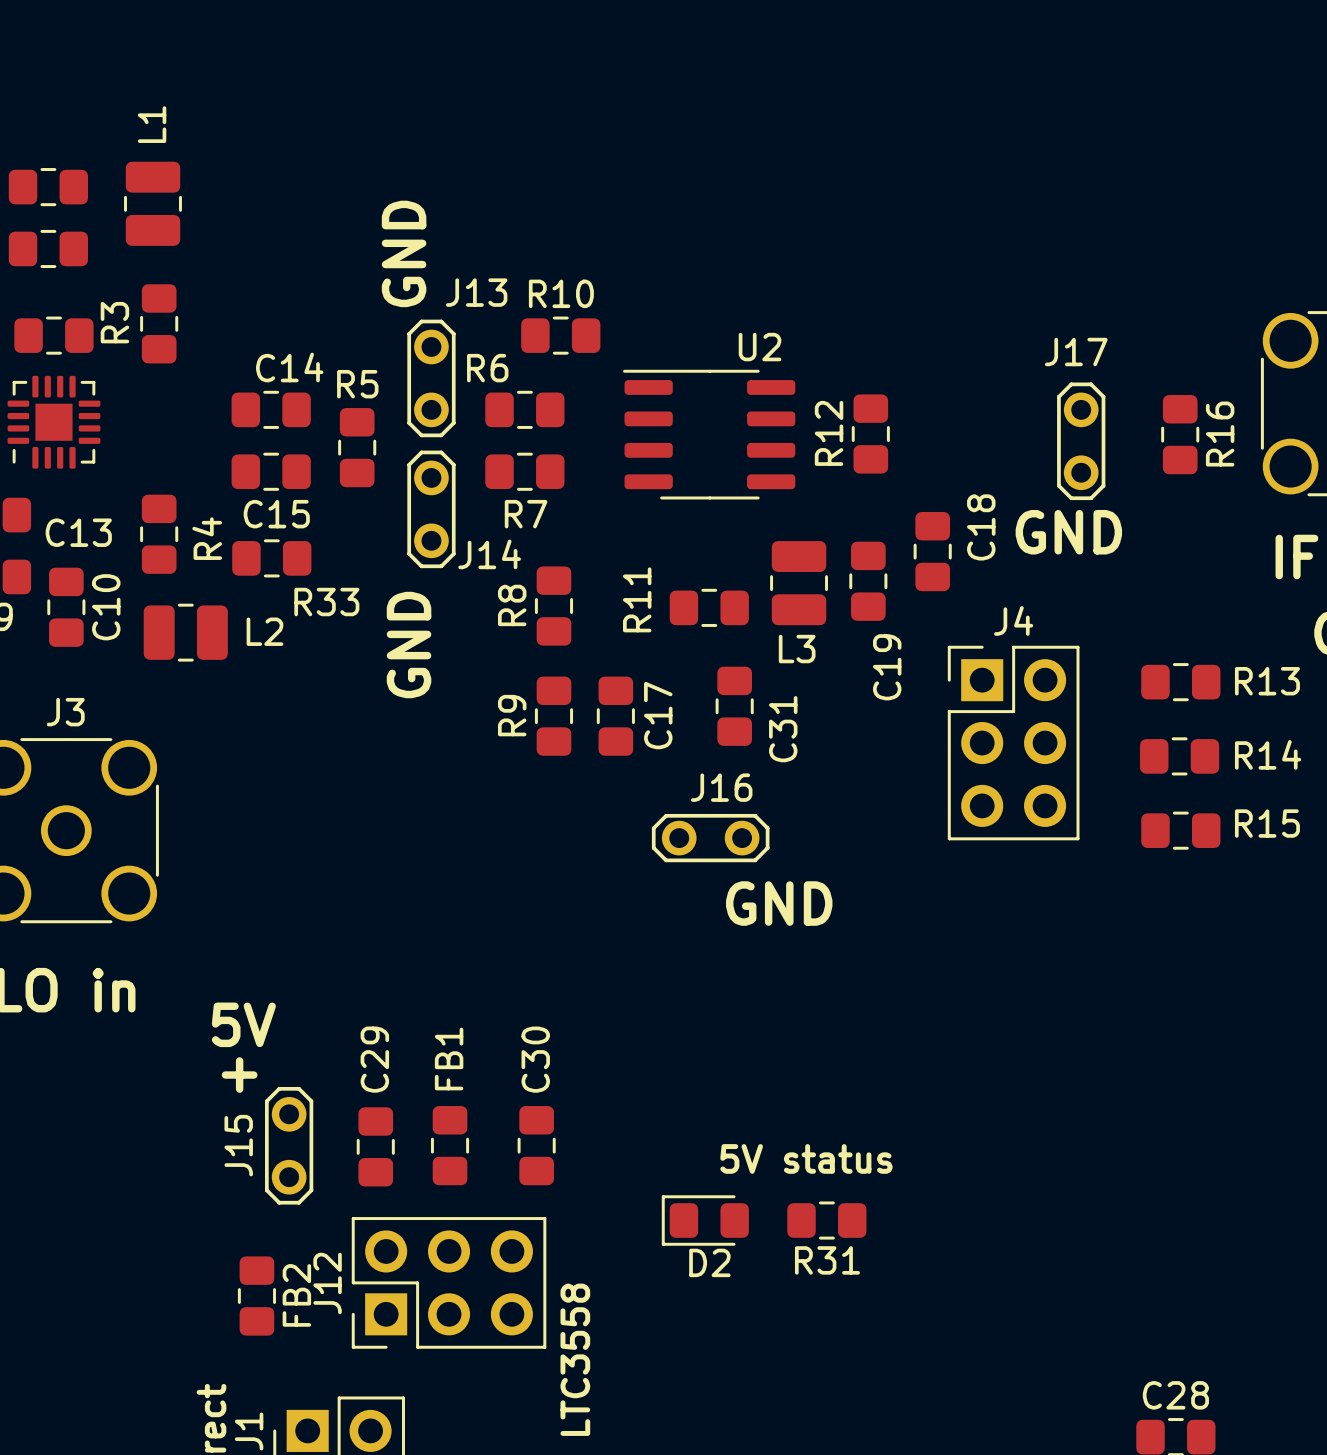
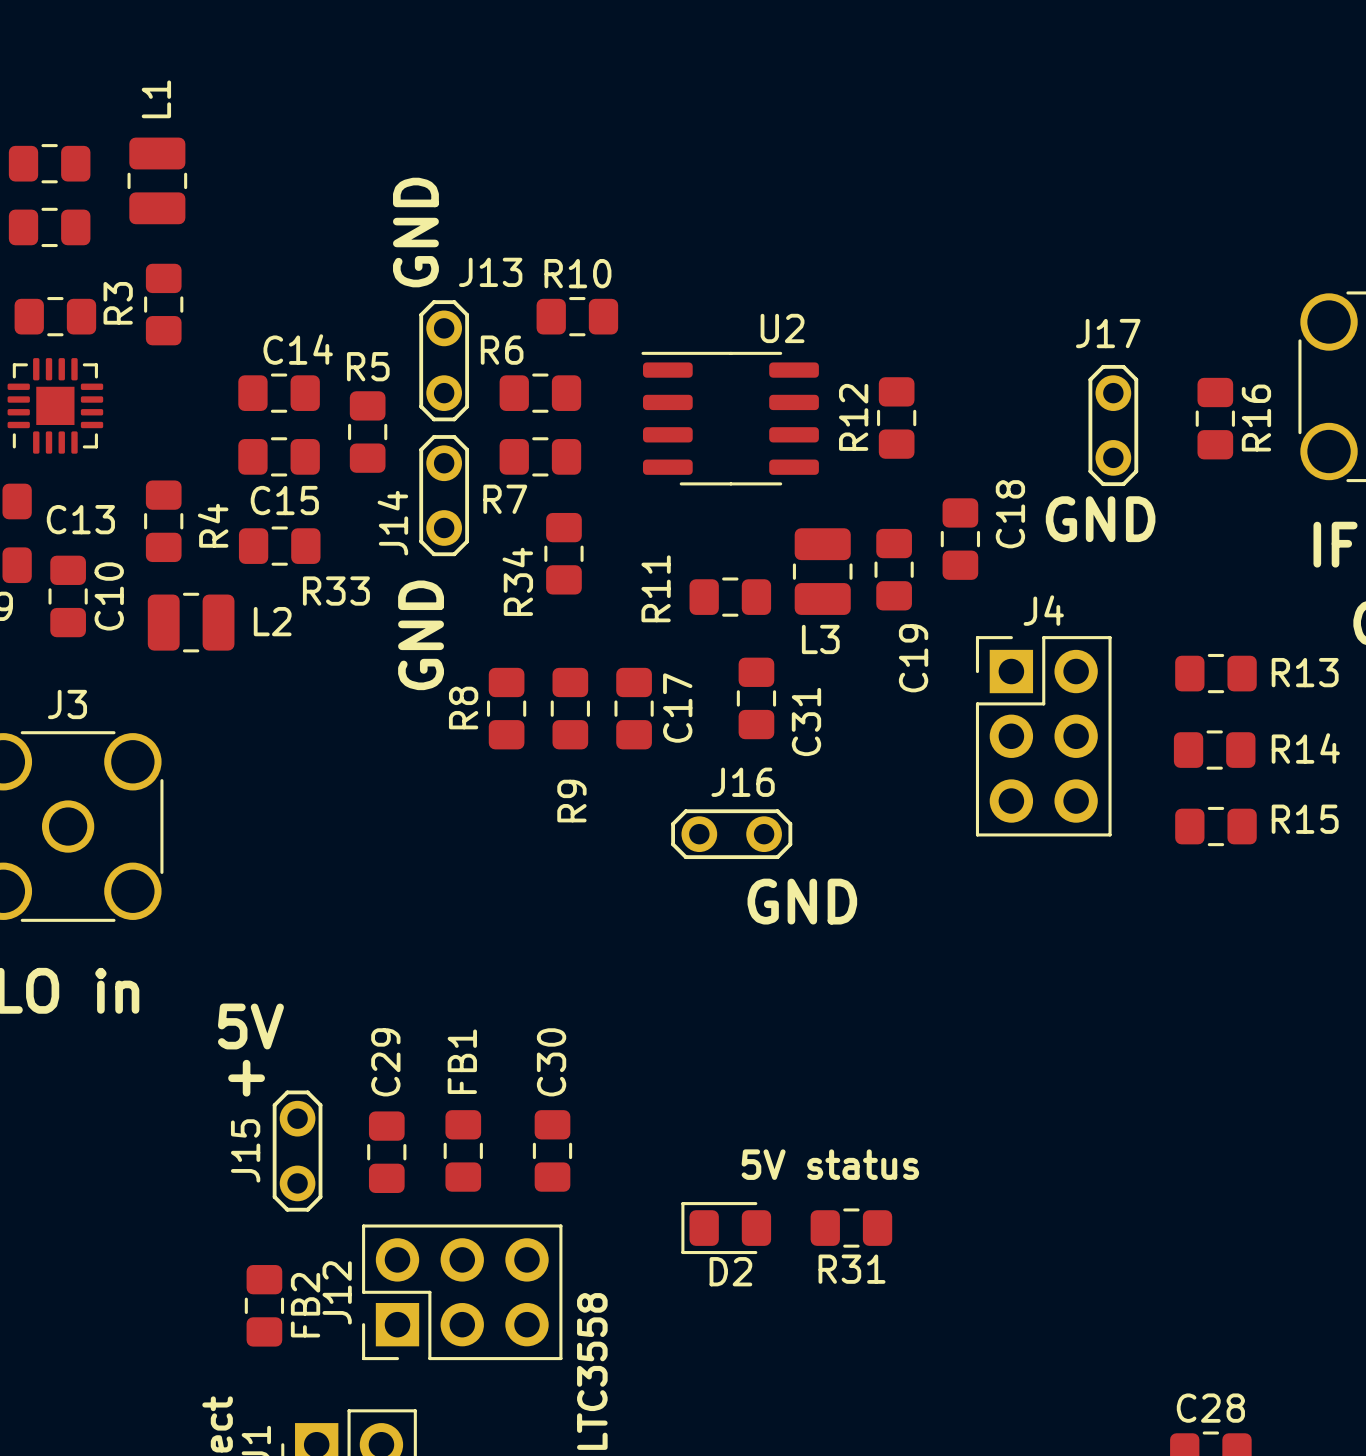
R7 name position: R7 (526, 514) -> R7 (505, 499)
J14 name rotation: 0° (489, 554) -> 90° counterclockwise (392, 523)
J14 name position: J14 (489, 554) -> J14 (392, 523)
R34: none -> (563, 553)
R8 position: (553, 606) -> (506, 708)
R9 name position: R9 (512, 715) -> R9 (571, 801)

